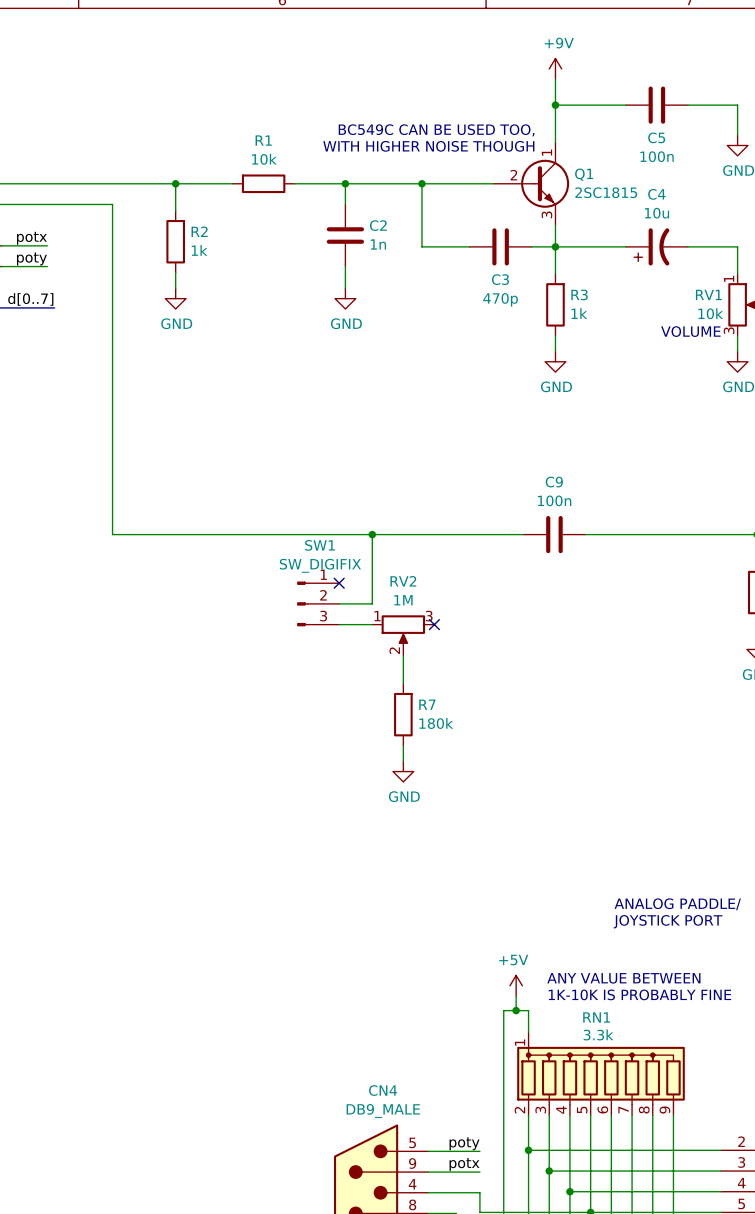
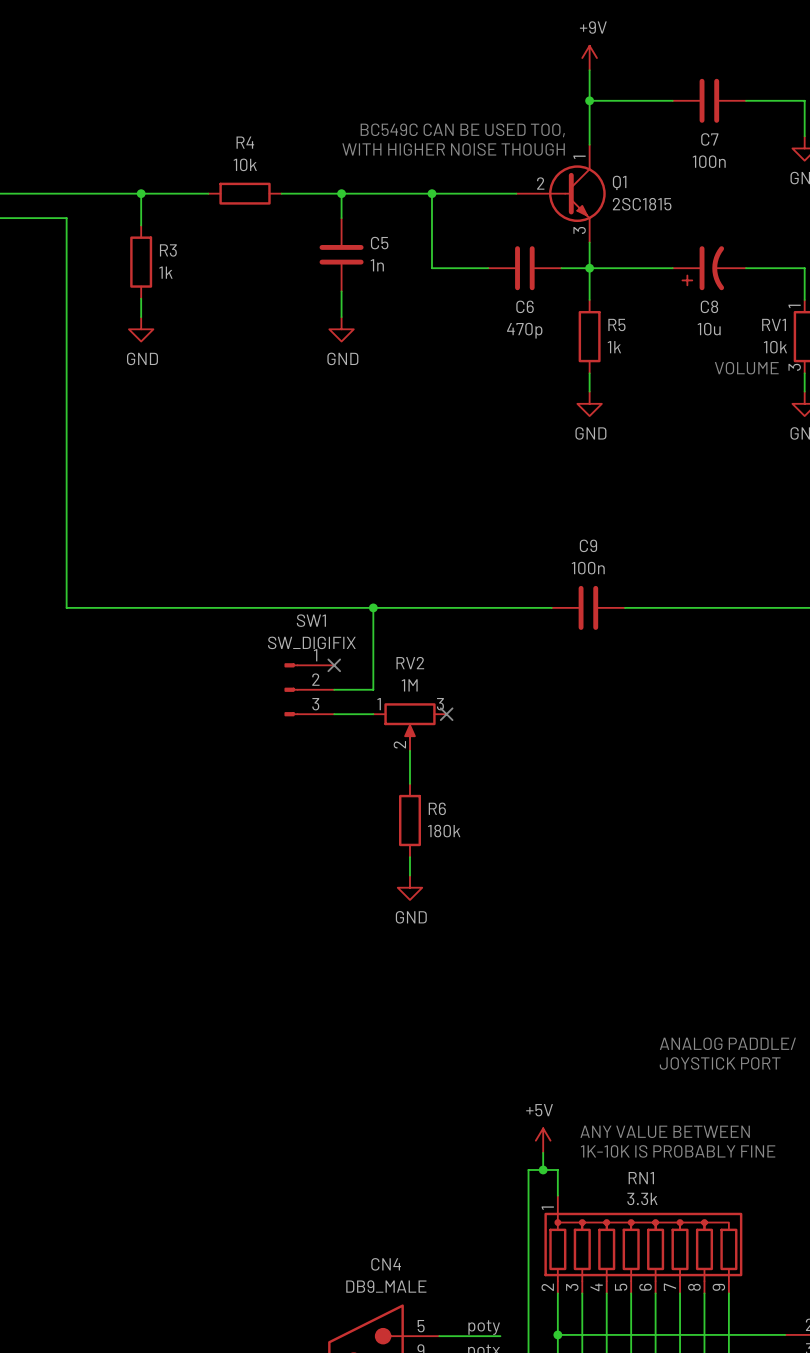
C5 name: C5 (656, 137) -> C7 (709, 139)
R1 name: R1 (263, 140) -> R4 (245, 142)
C4 name: C4 (656, 194) -> C8 (709, 306)
C4 value position: 10u (657, 213) -> 10u (709, 329)
C2 name: C2 (378, 225) -> C5 (379, 243)
R2 name: R2 (199, 231) -> R3 (168, 250)
C3 name: C3 (500, 279) -> C6 (525, 306)
R3 name: R3 (579, 294) -> R5 (616, 324)
R7 name: R7 (427, 704) -> R6 (437, 808)

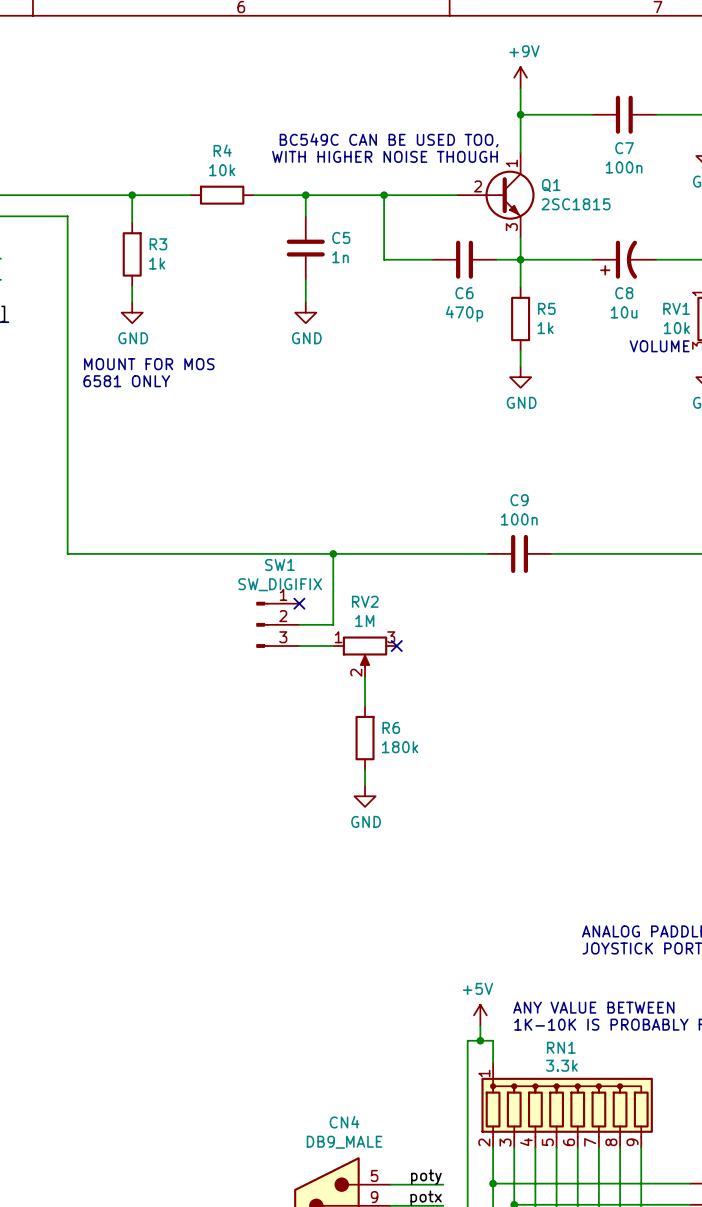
text: none -> MOUNT FOR MOS (149, 364)
text: none -> 6581 ONLY (126, 381)

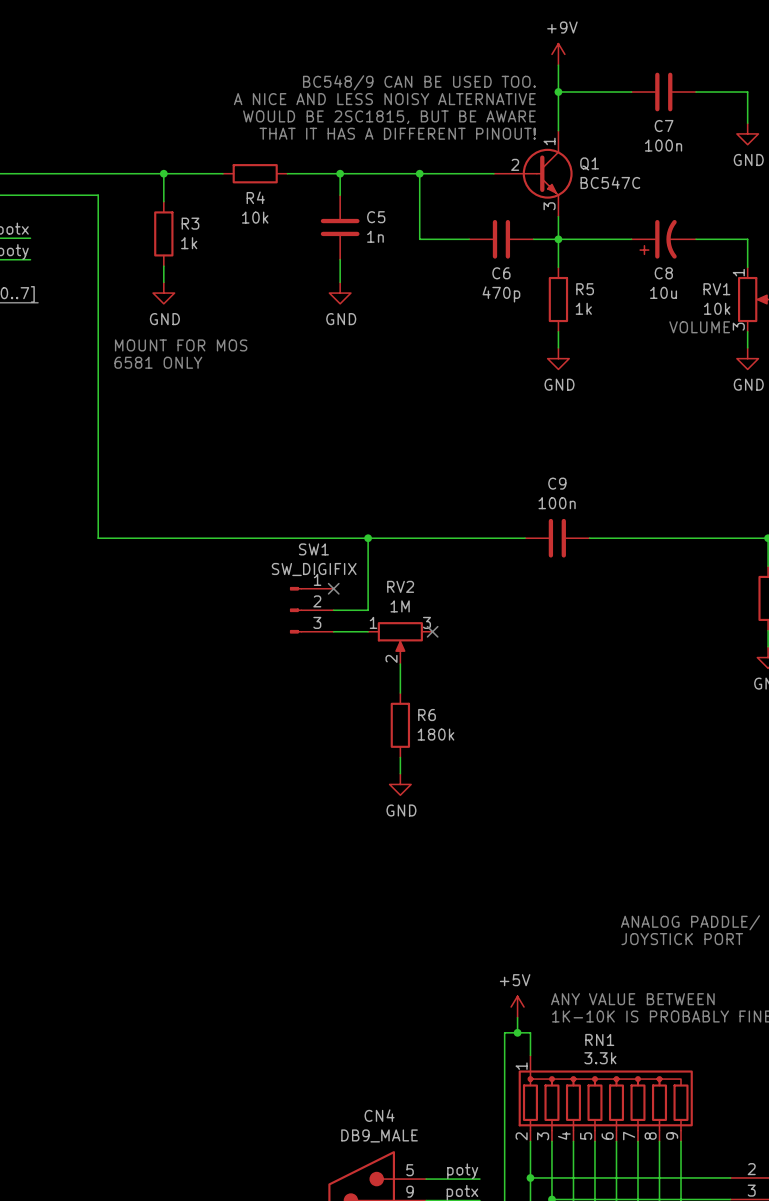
text: none -> BC548/9 CAN BE USED TOO. (419, 82)
text: none -> A NICE AND LESS NOISY ALTERNATIVE (384, 99)
text: BC549C CAN BE USED TOO, (389, 140) -> WOULD BE 2SC1815, BUT BE AWARE (389, 117)
R4 name position: R4 (222, 150) -> R4 (255, 197)
text: WITH HIGHER NOISE THOUGH (385, 156) -> THAT IT HAS A DIFFERENT PINOUT! (397, 133)
R4 value position: 10k (222, 170) -> 10k (255, 217)
Q1 value: 2SC1815 (575, 204) -> BC547C (610, 182)

